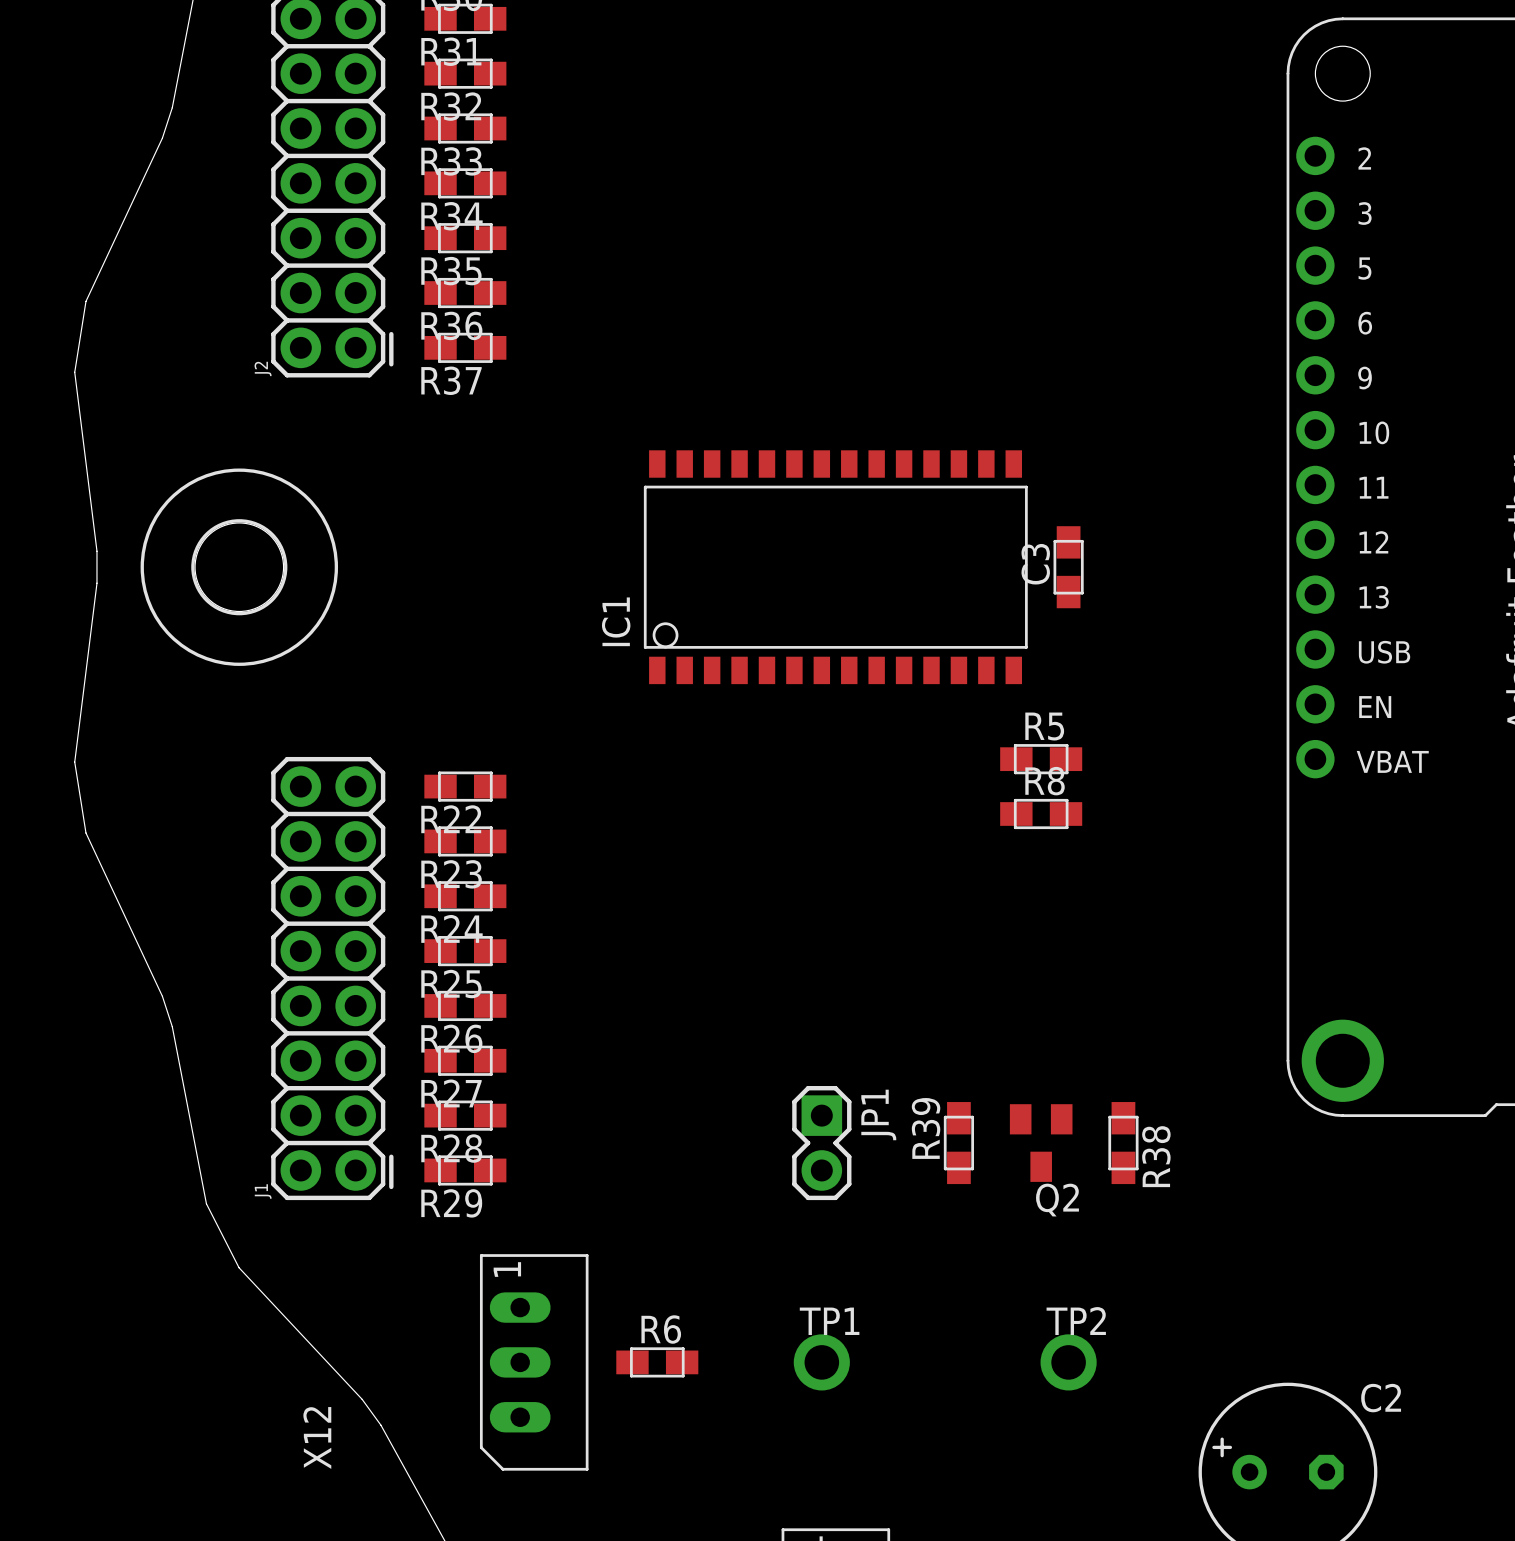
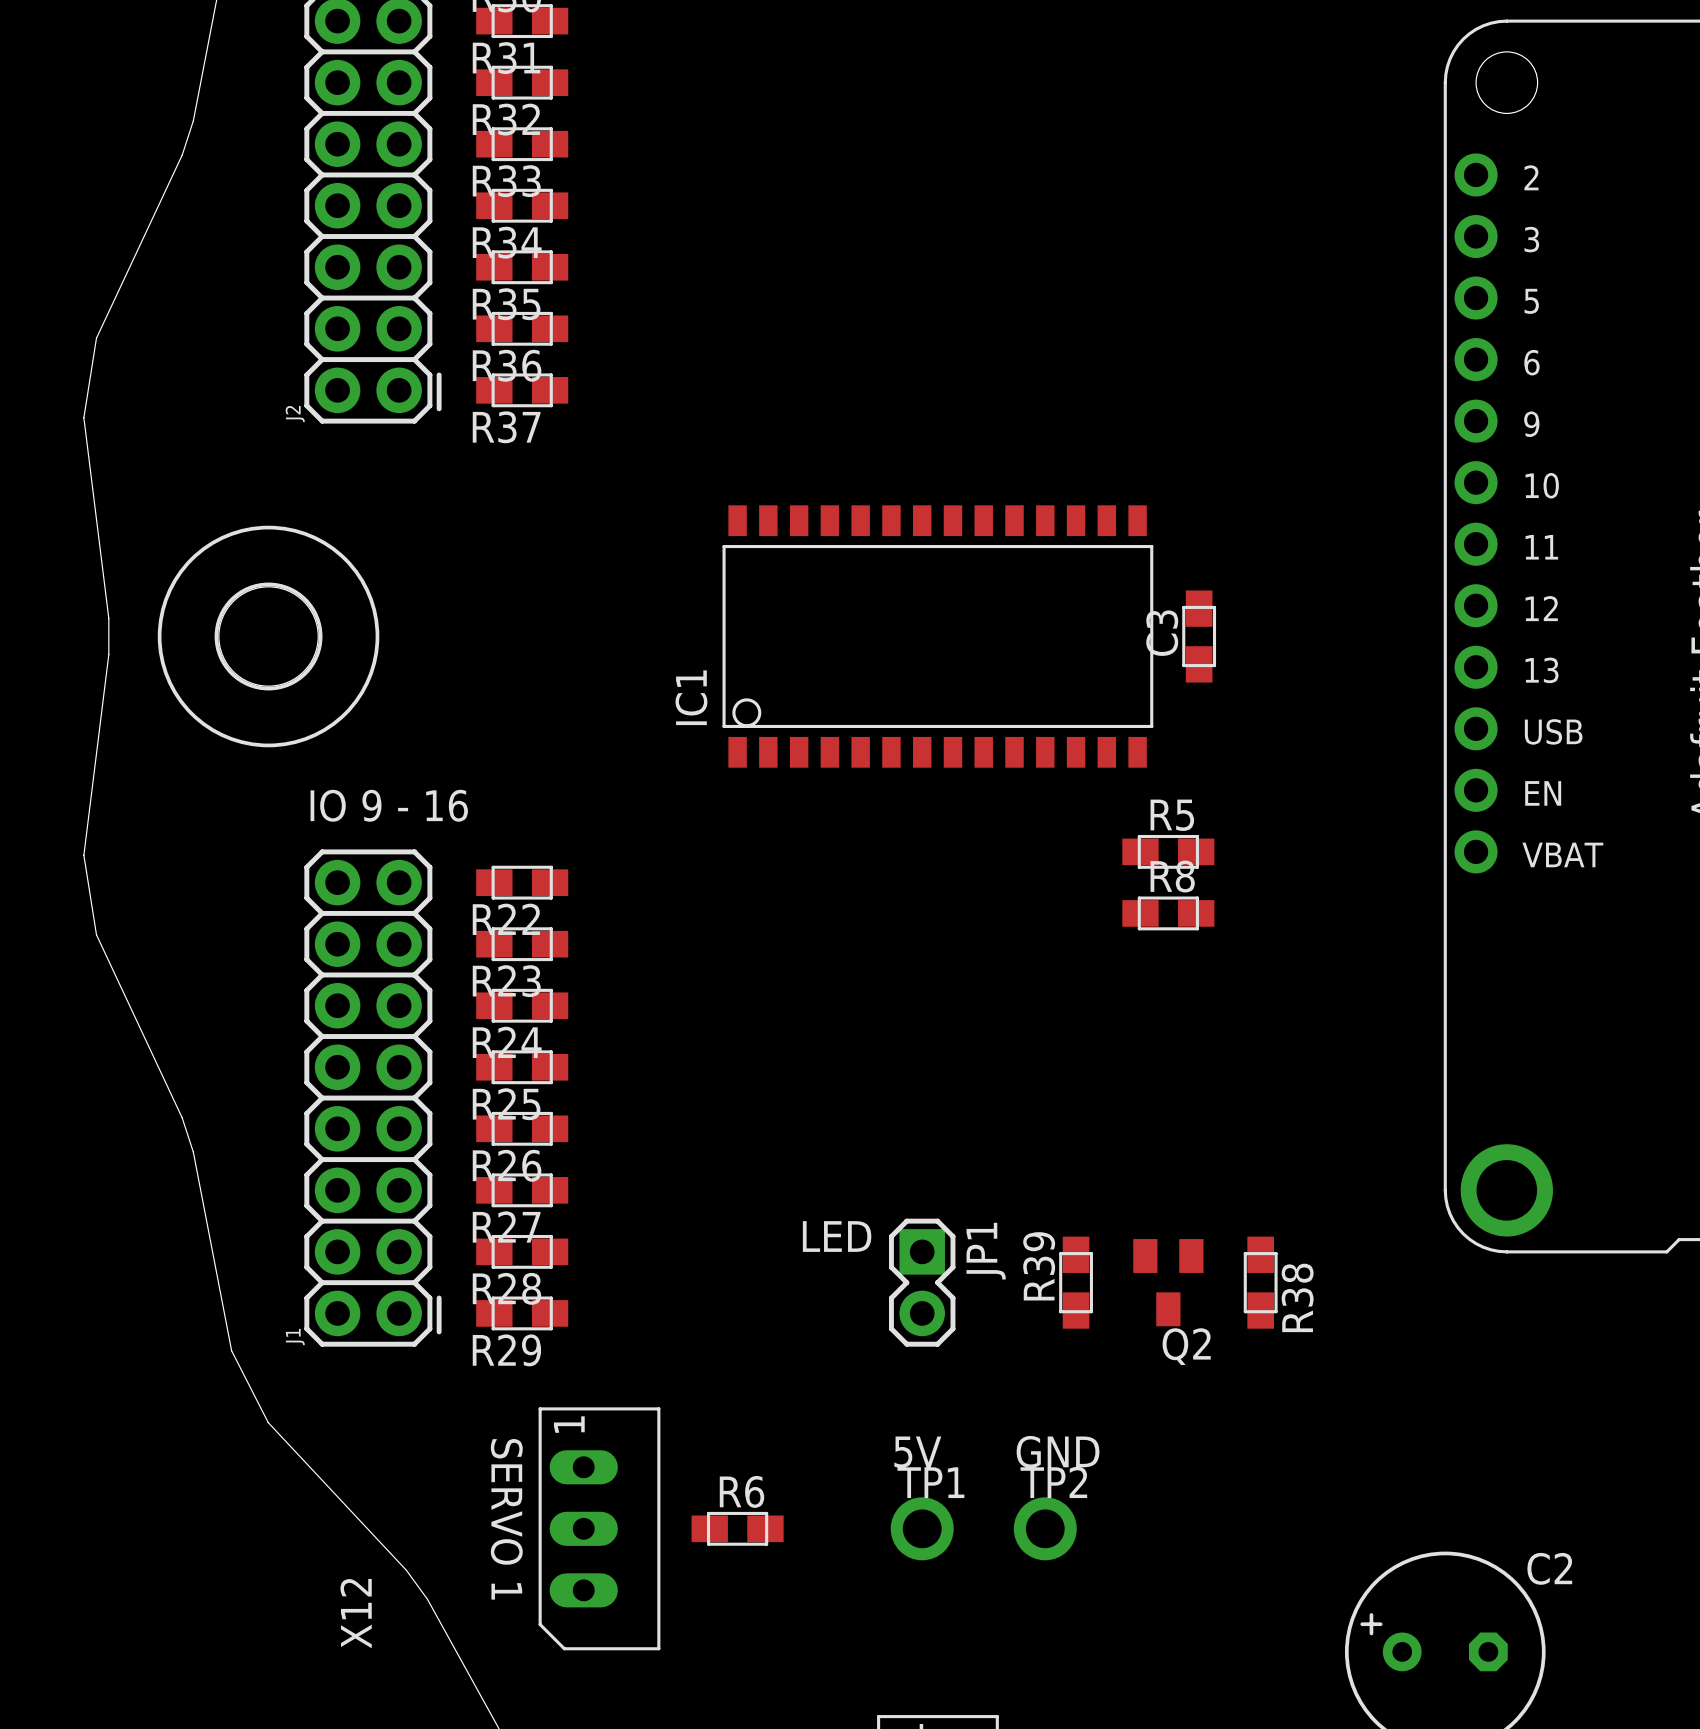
text: none -> IO 9 - 16 (389, 805)
text: none -> LED (837, 1236)
text: none -> GND (1058, 1451)
text: none -> 5V (917, 1452)
text: none -> SERVO 1 (506, 1519)
TP2 position: (1068, 1362) -> (1045, 1528)

